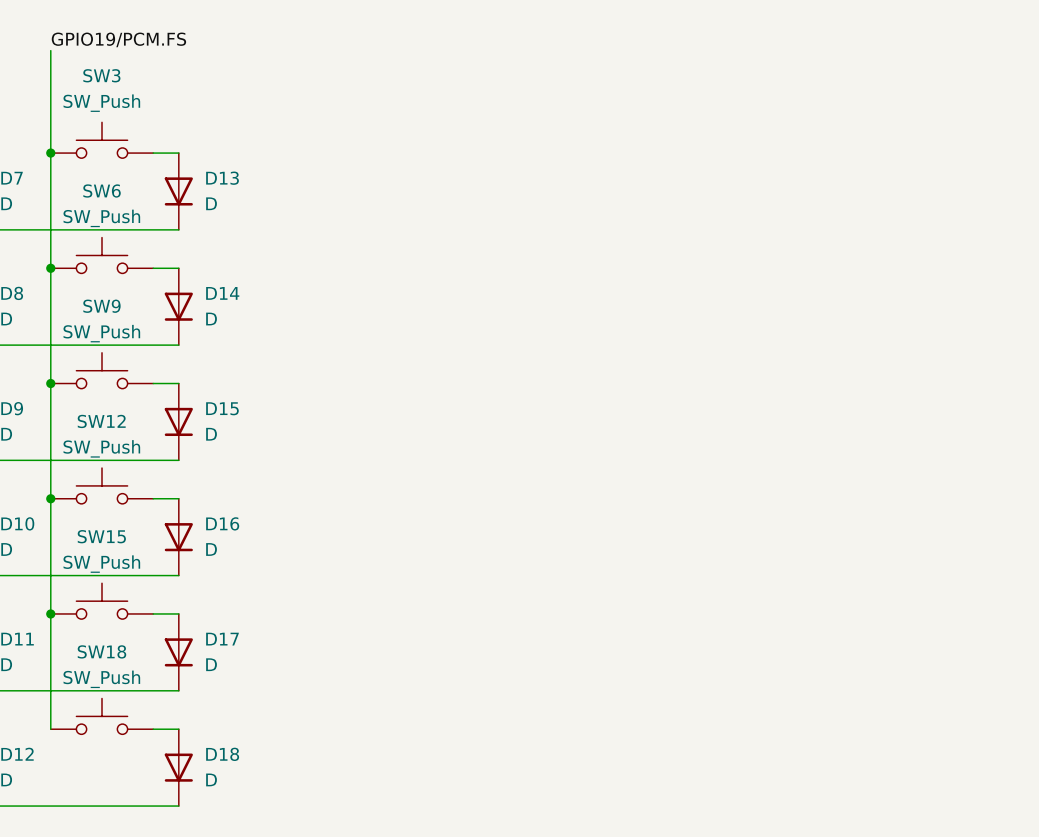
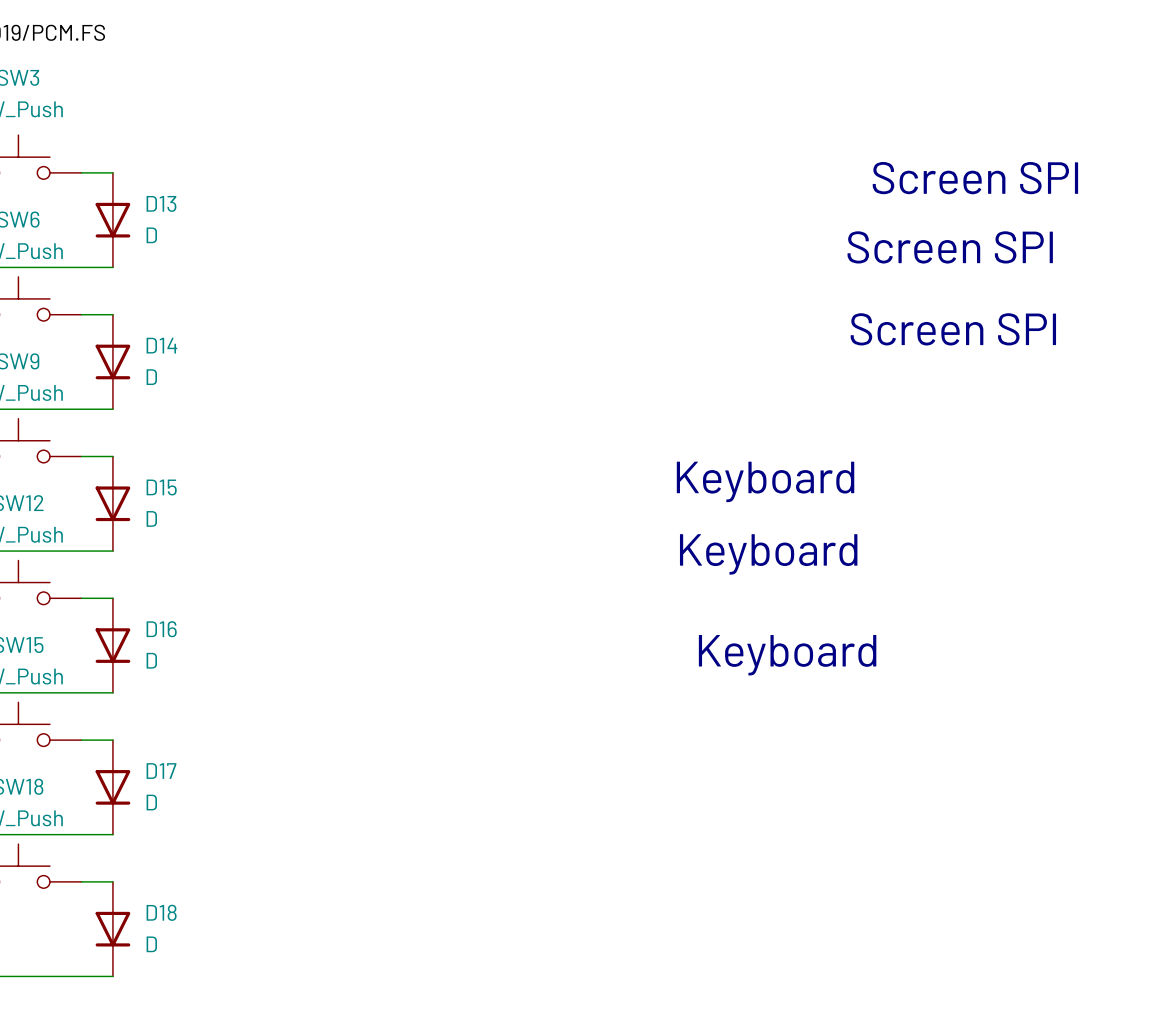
text: none -> Screen SPI (975, 178)
text: none -> Screen SPI (950, 247)
text: none -> Screen SPI (953, 329)
text: none -> Keyboard (765, 481)
text: none -> Keyboard (768, 554)
text: none -> Keyboard (787, 655)

